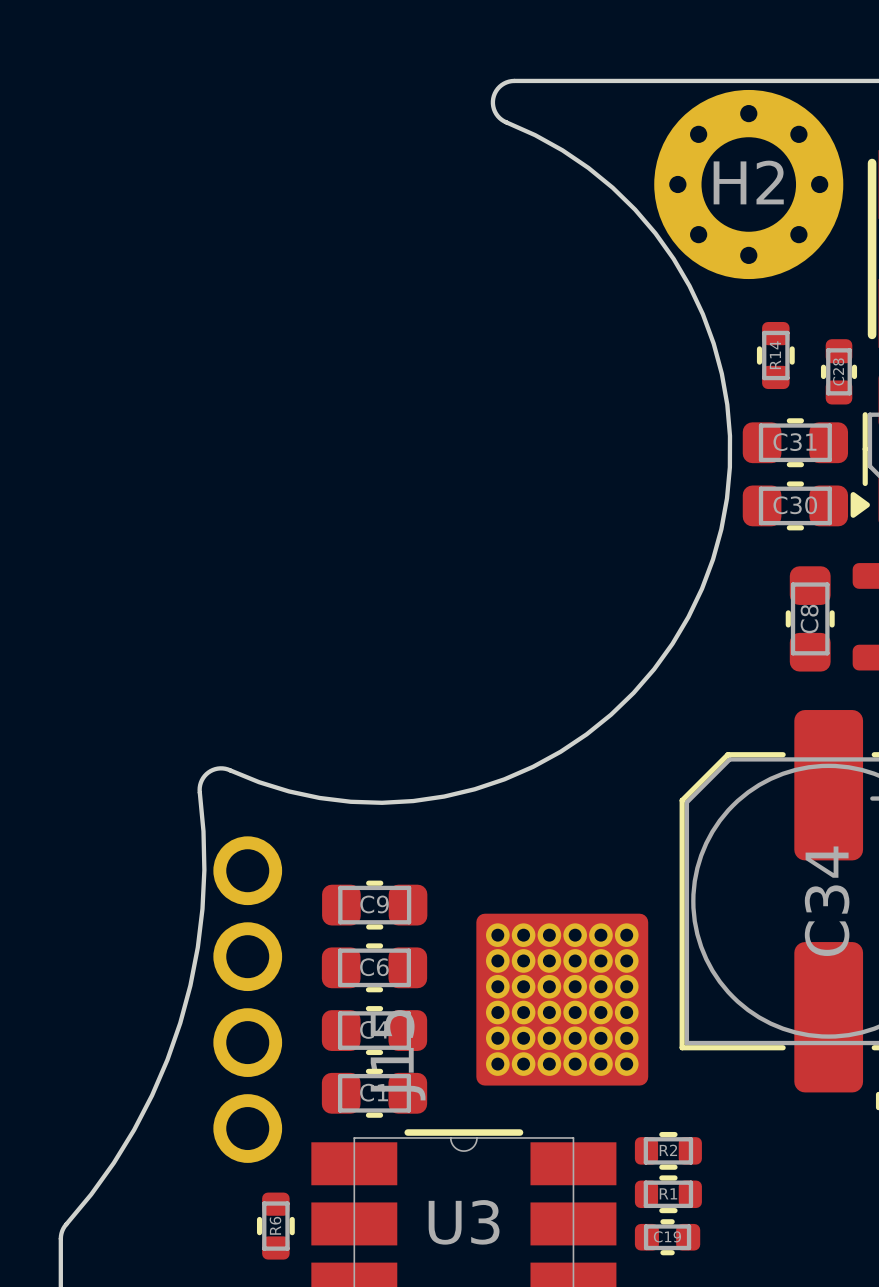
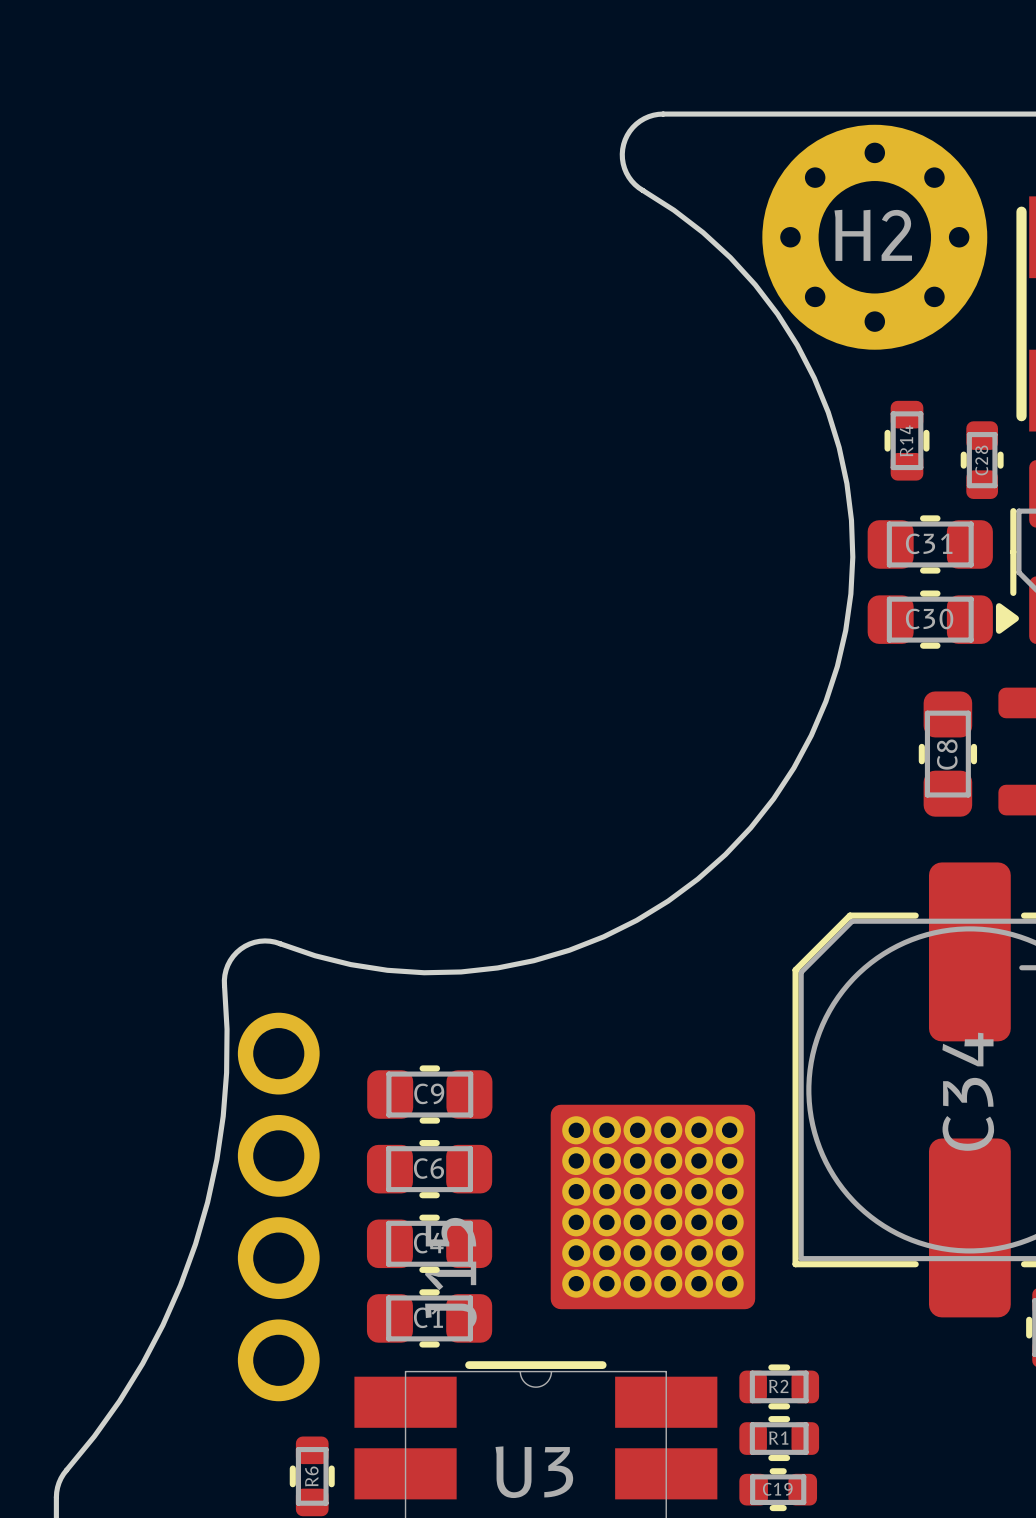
board edge: (570, 80) (506, 82) (496, 90) (493, 98) (493, 106) (496, 113) (501, 119) (535, 135) (588, 167) (635, 209) (673, 258) (702, 314) (721, 373) (729, 435) (729, 467) (721, 529) (702, 588) (672, 643) (654, 669) (611, 714) (560, 751) (504, 779) (444, 796) (382, 802) (350, 801) (289, 791) (225, 768) (215, 769) (206, 774) (201, 780) (199, 790) (203, 831) (202, 908) (197, 947) (180, 1023) (152, 1095) (134, 1129) (91, 1194) (64, 1226) (61, 1233) (60, 1243) -> (663, 114) (644, 118) (629, 131) (622, 149) (623, 163) (626, 172) (638, 187) (673, 210) (703, 232) (730, 257) (755, 284) (777, 314) (797, 345) (814, 378) (828, 412) (839, 447) (846, 483) (851, 520) (852, 557) (850, 593) (845, 630) (837, 666) (825, 701) (811, 735) (793, 767) (773, 798) (750, 827) (725, 854) (697, 879) (668, 901) (636, 920) (603, 936) (569, 950) (533, 960) (497, 967) (461, 971) (424, 972) (387, 970) (350, 964) (270, 941) (249, 943) (236, 952) (227, 965) (224, 980) (227, 1029) (223, 1116) (207, 1202) (195, 1244) (162, 1325) (142, 1363) (94, 1436) (63, 1474) (57, 1487) (56, 1497)

